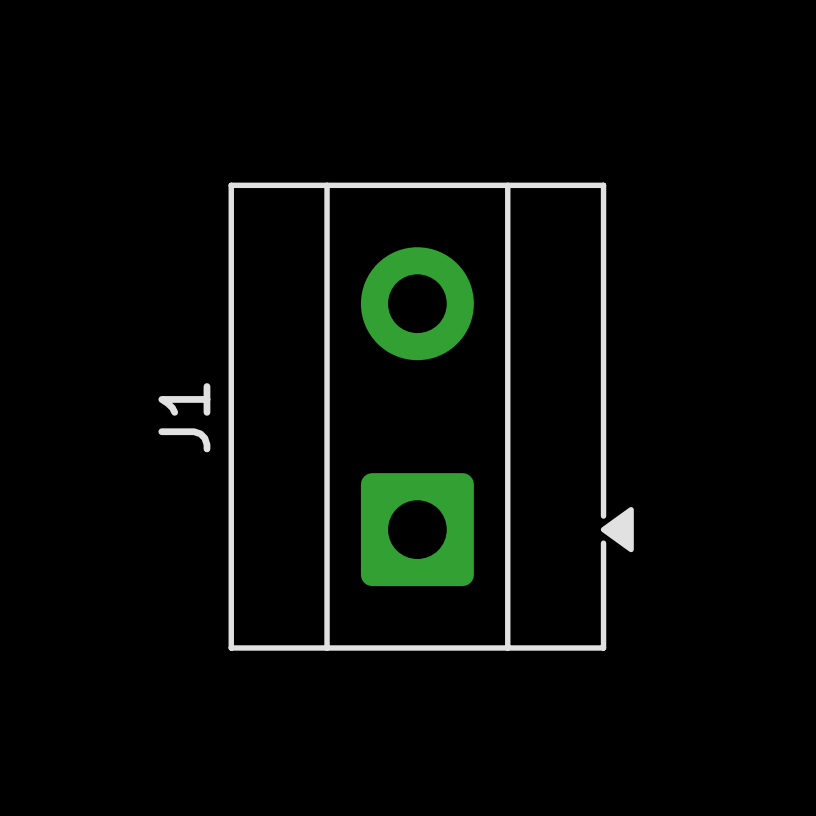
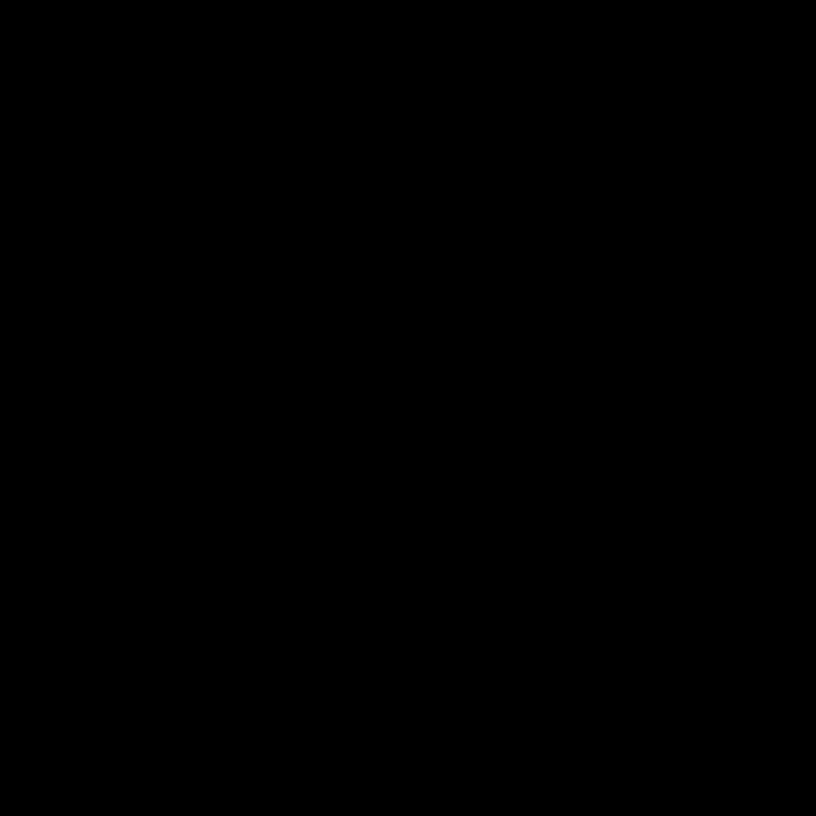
J1: (431, 416) -> none

